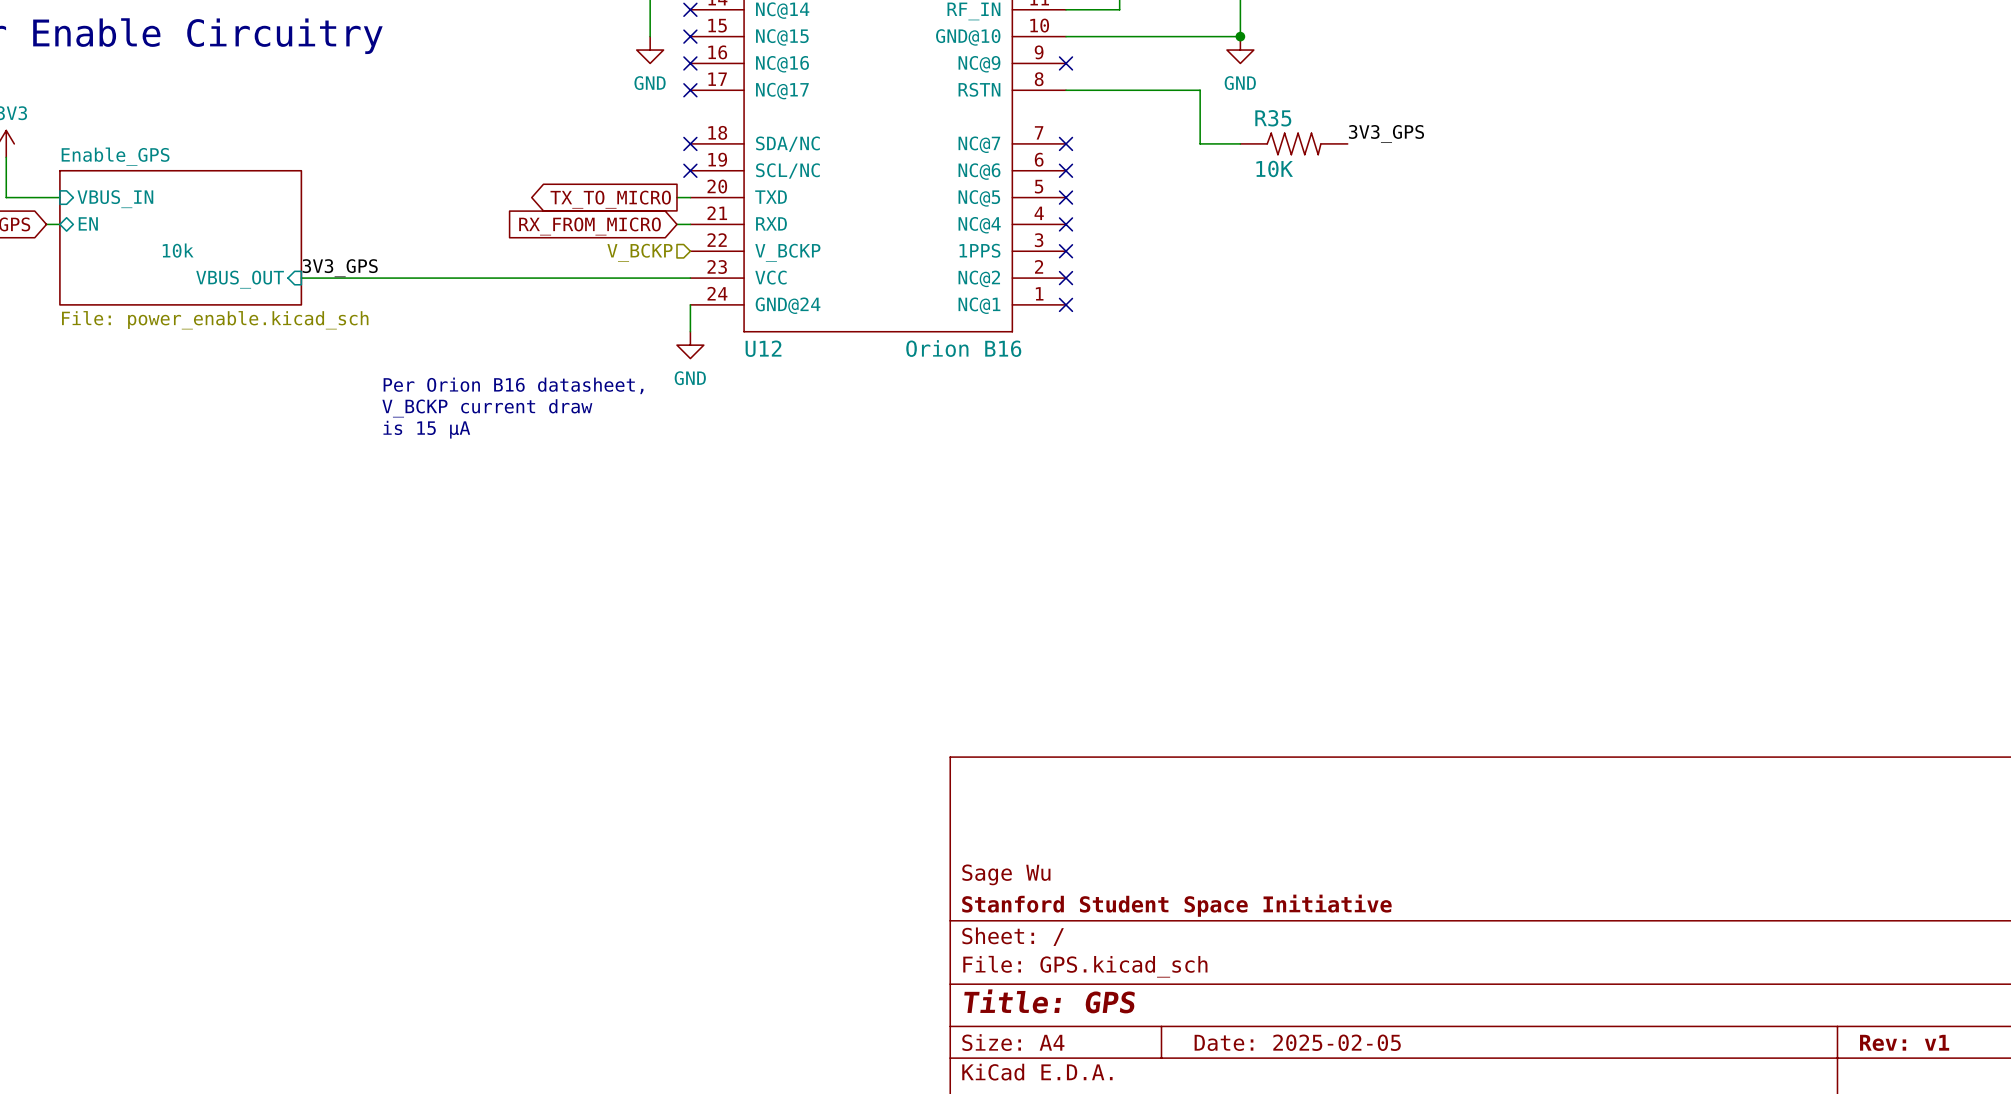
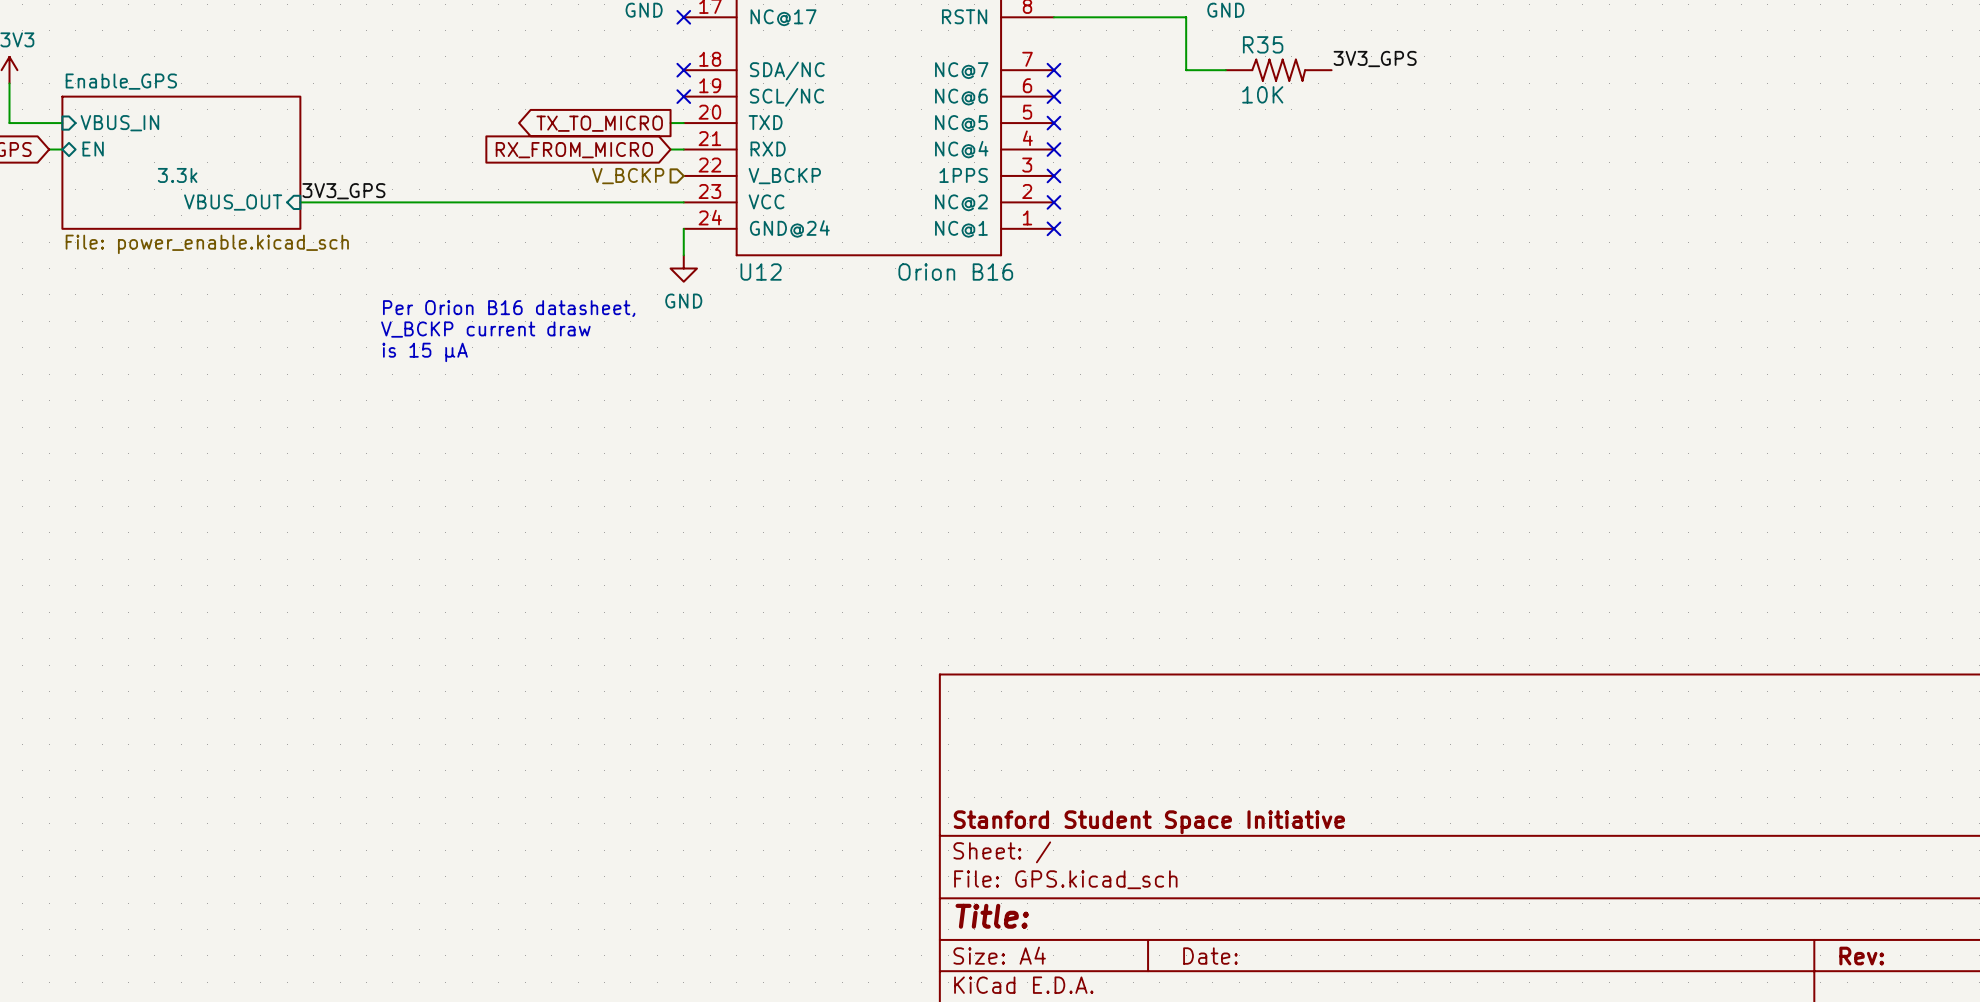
sheet Enable_GPS text: 10k (178, 250) -> 3.3k (177, 175)
title block: Sage Wu (1006, 874) -> none
title block: Title: GPS (1049, 1001) -> Title: (992, 916)
title block: Date: 2025-02-05 (1297, 1042) -> Date: (1210, 956)
title block: Rev: v1 (1904, 1042) -> Rev: (1861, 956)

